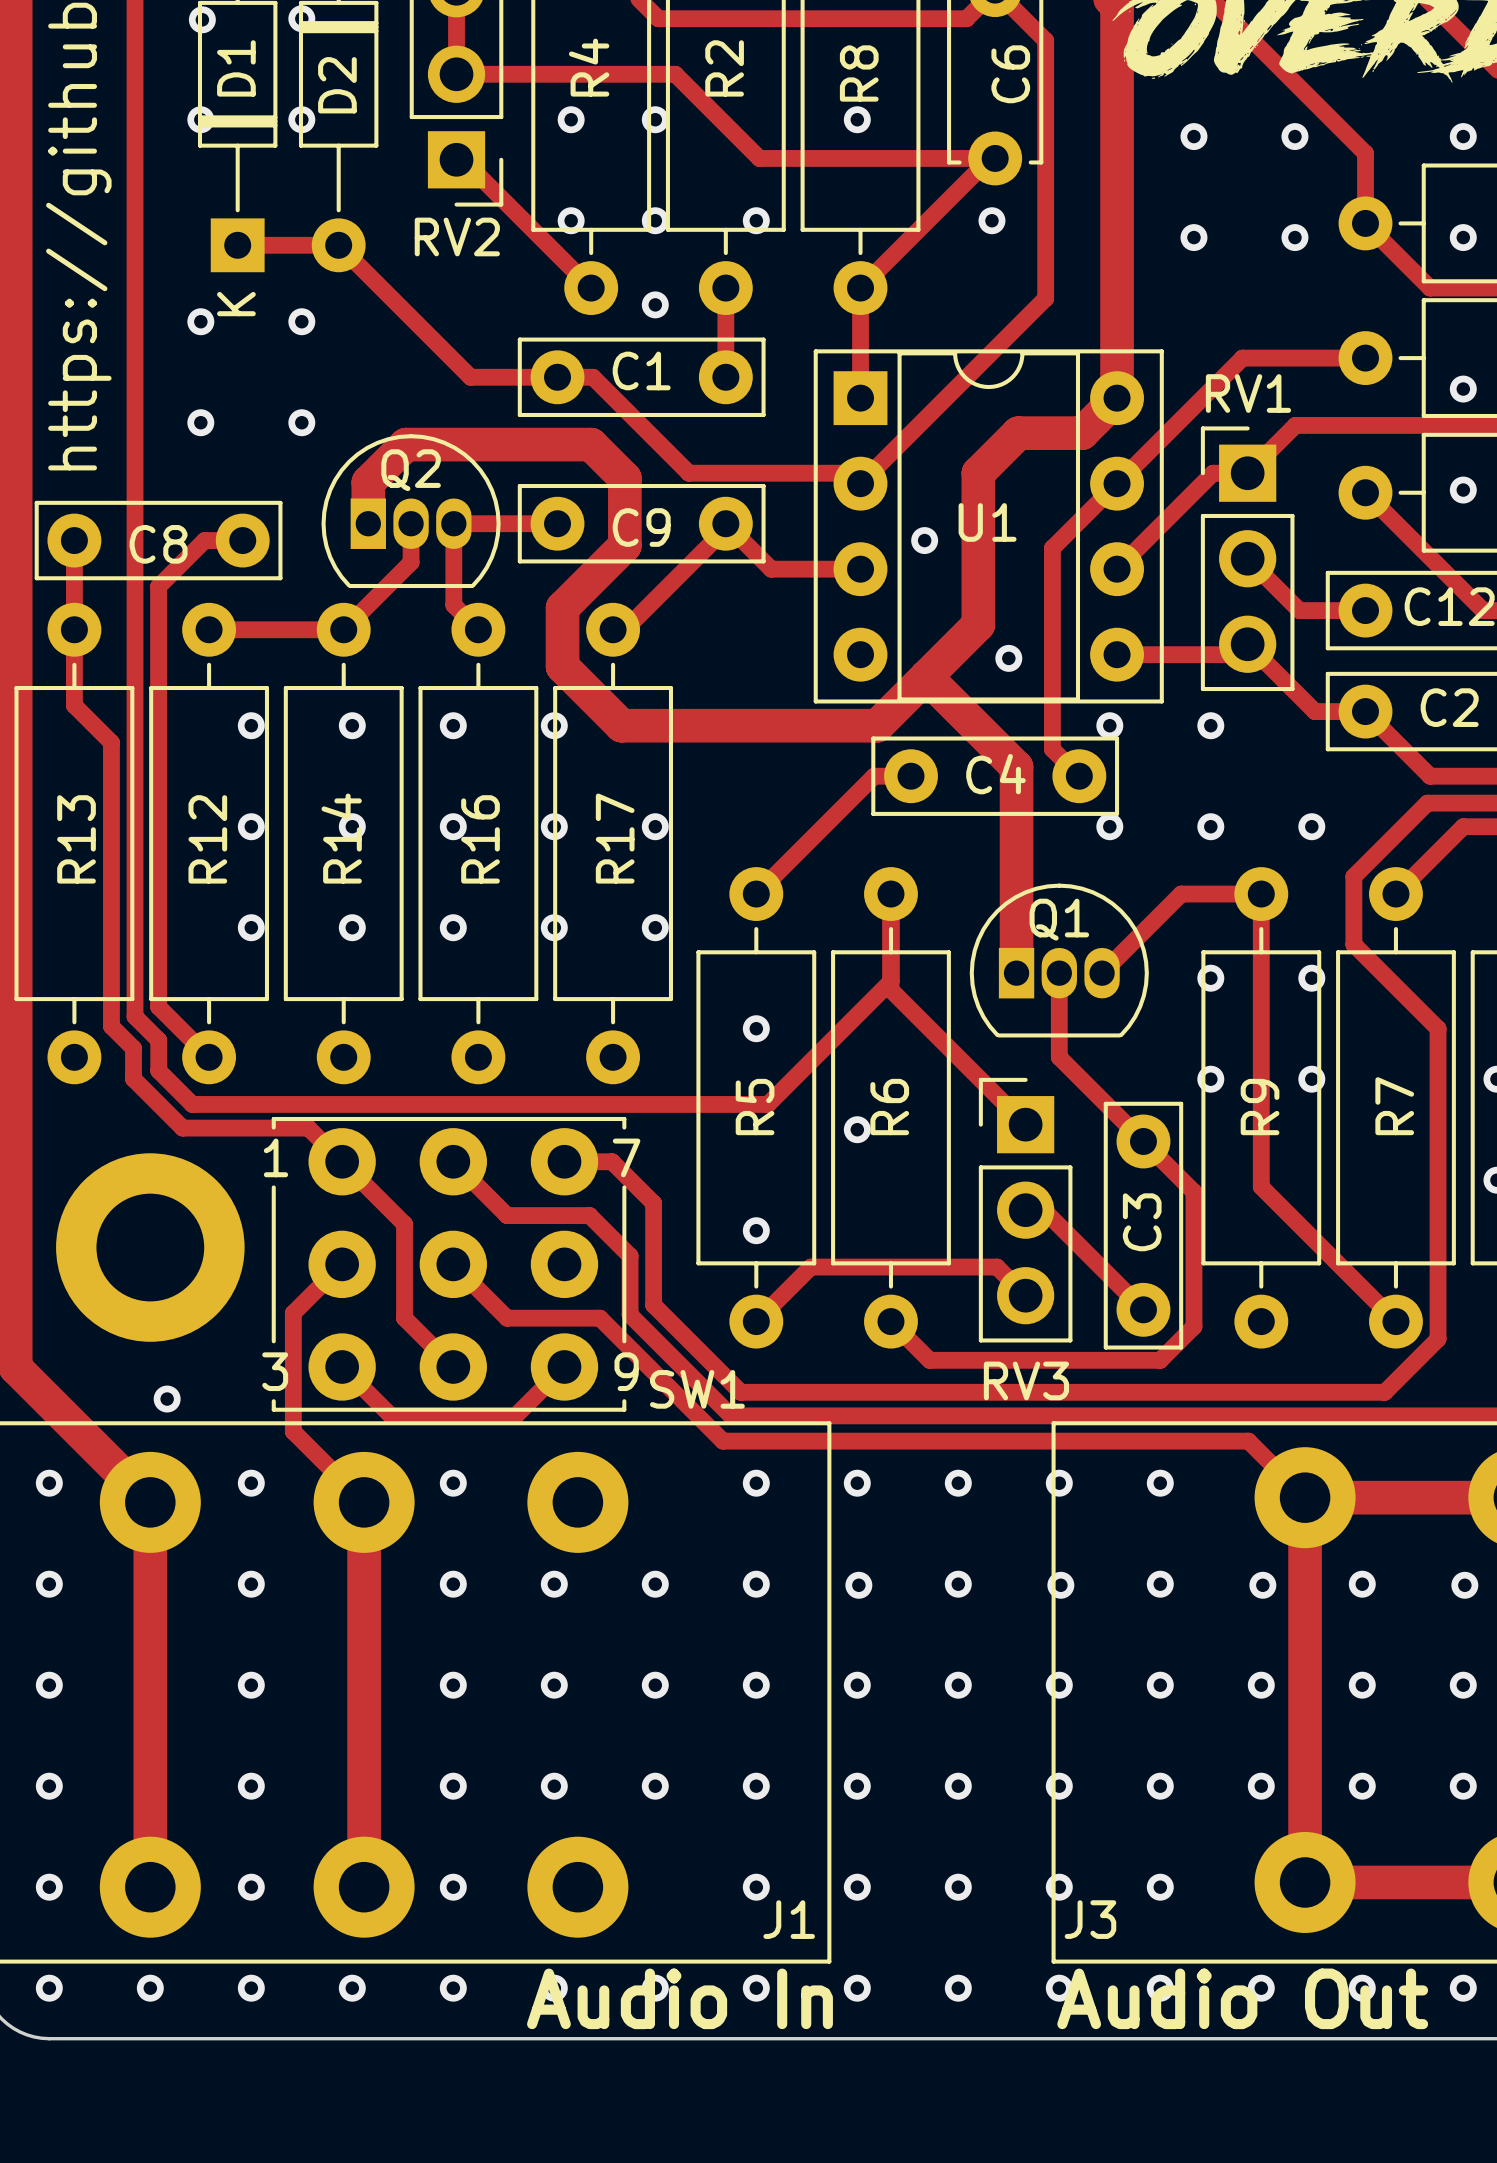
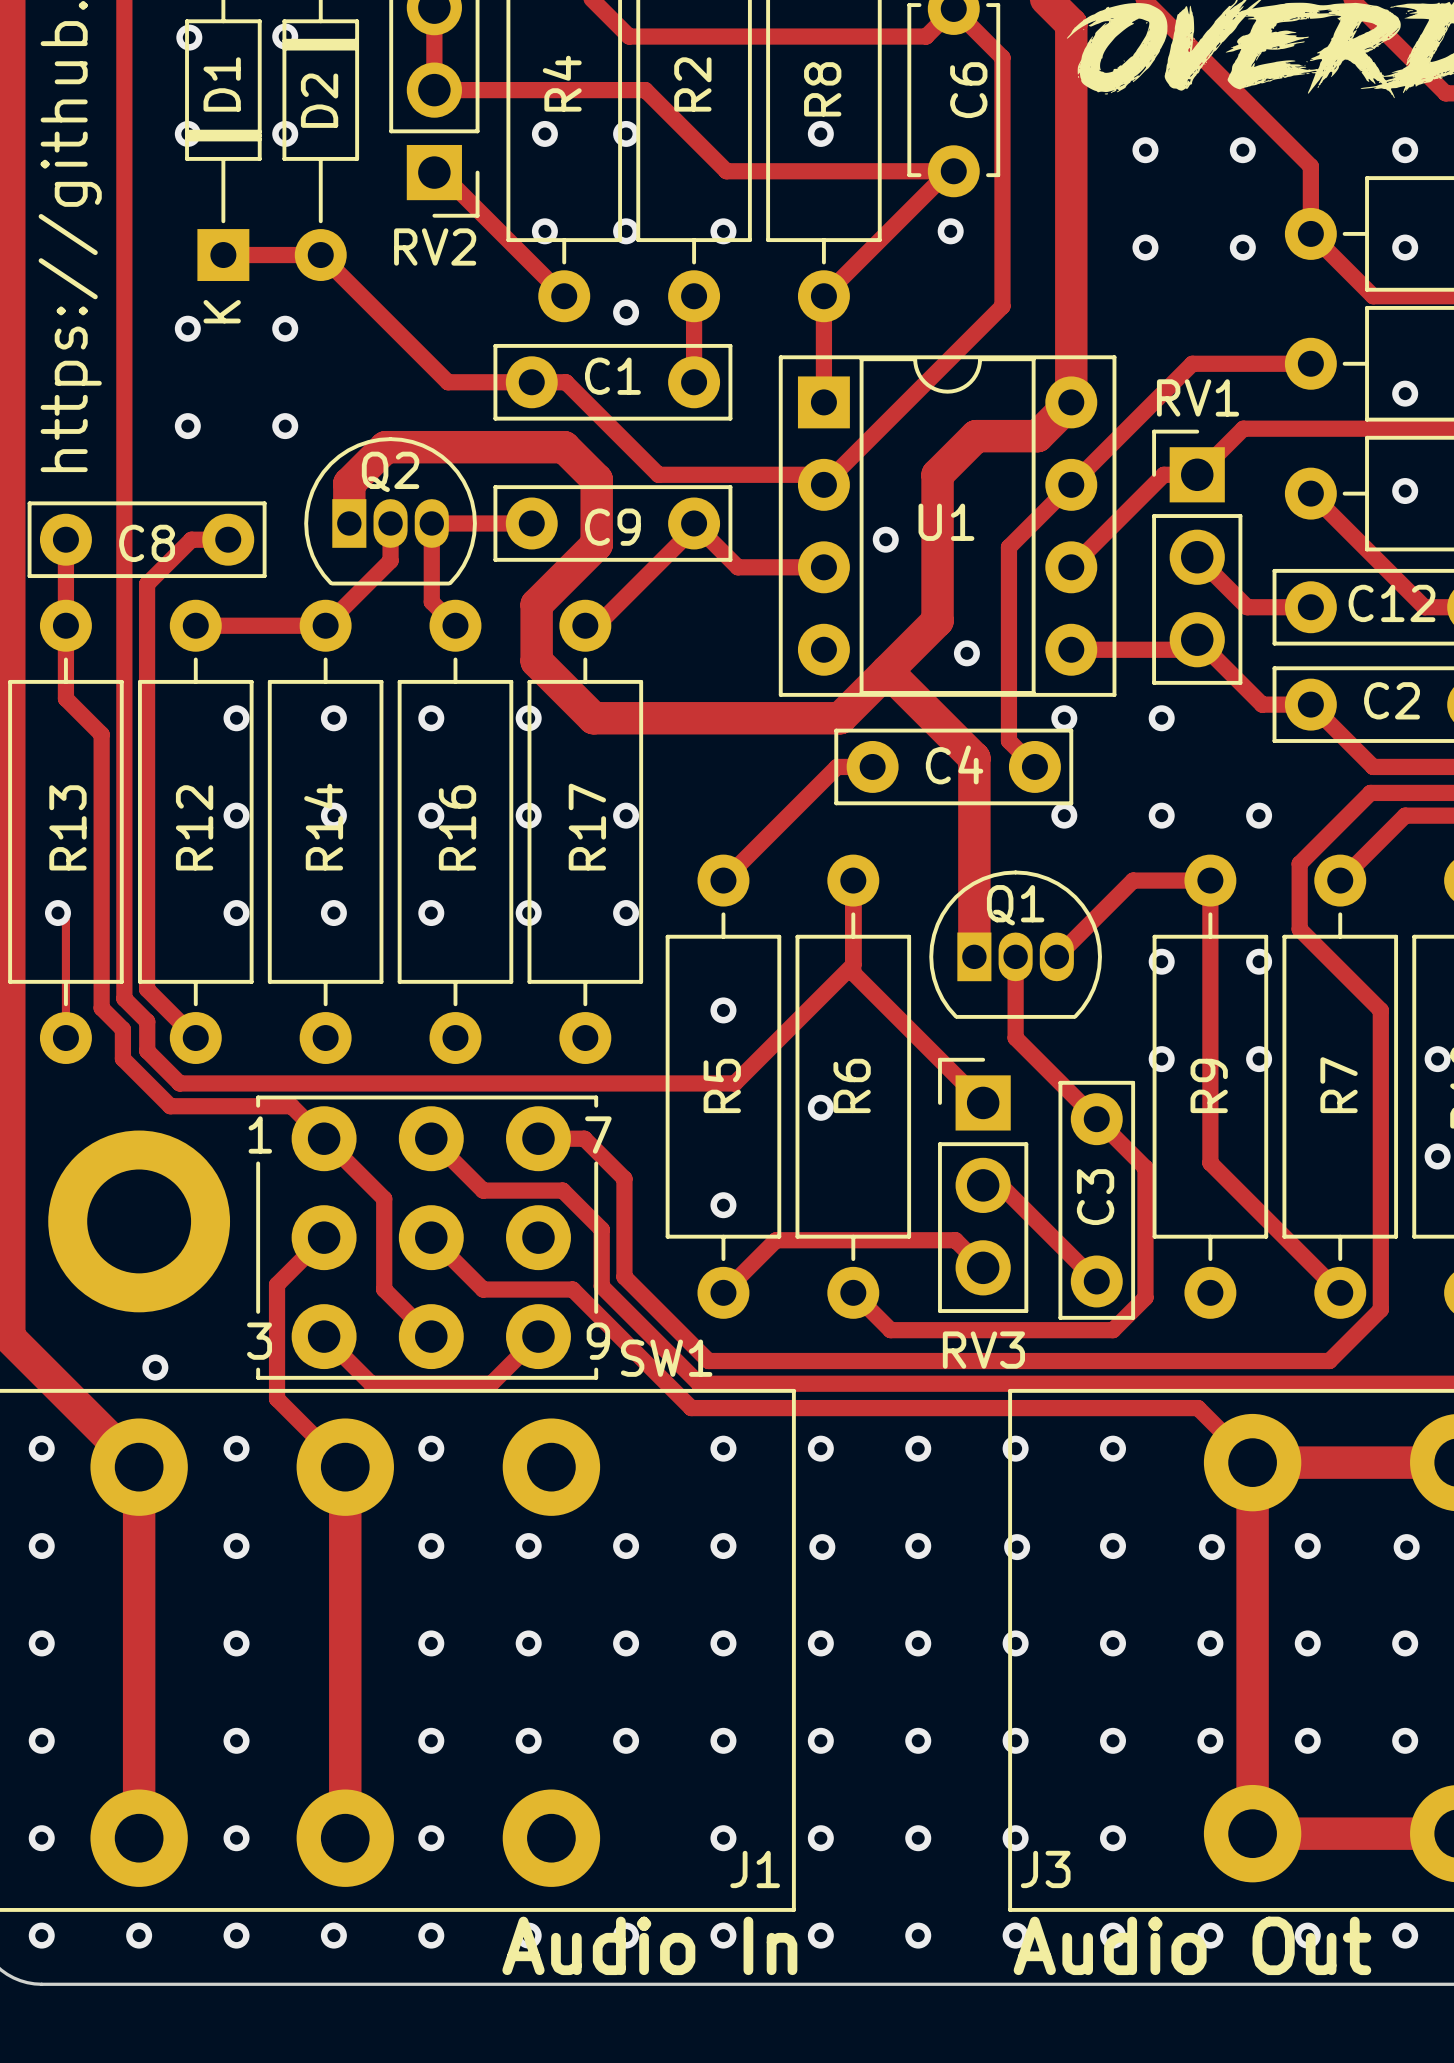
top track: none -> (57, 913) (65, 920) (65, 1038)
via: none -> (57, 913)

